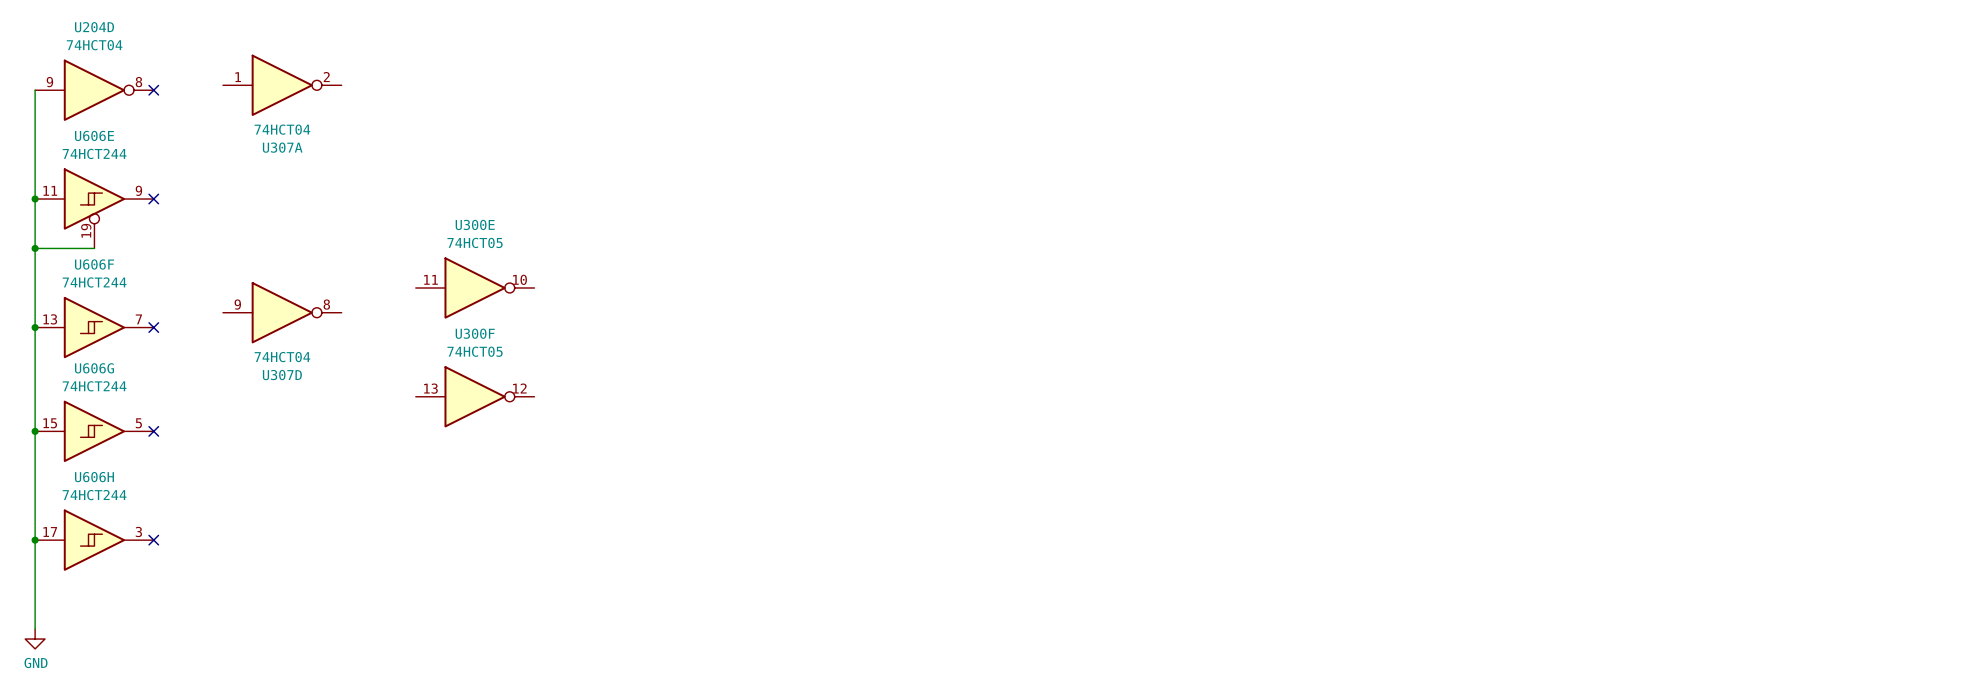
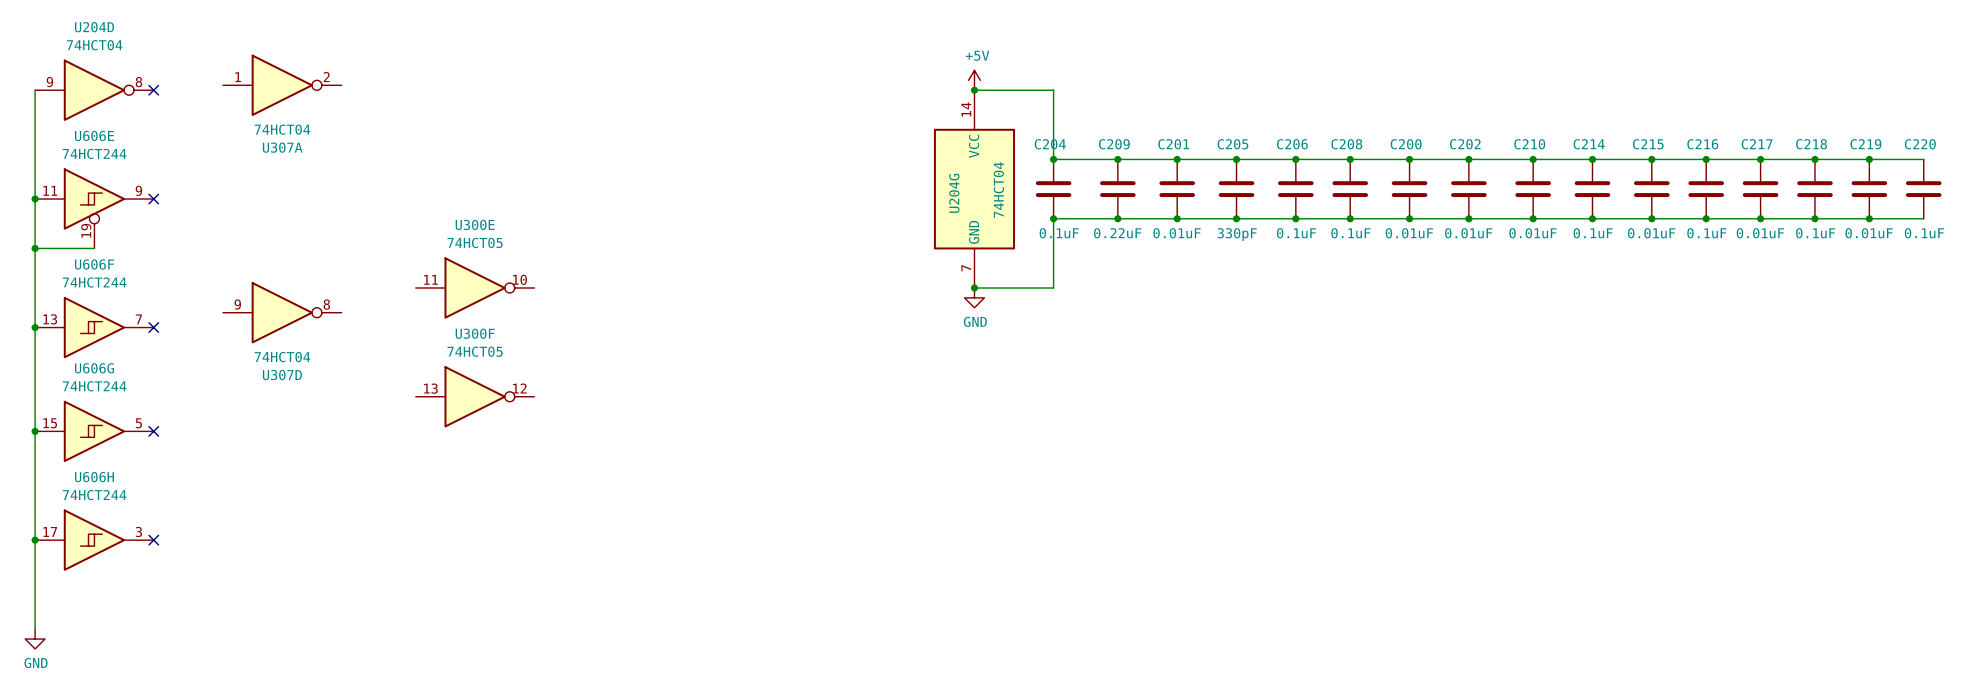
power symbol: none -> +5V (974, 80)
wire: none -> (974, 90) (1053, 90) (1053, 159) (1923, 159)
junction: none -> (974, 90)
junction: none -> (1053, 159)
junction: none -> (1117, 159)
junction: none -> (1177, 159)
junction: none -> (1236, 159)
junction: none -> (1295, 159)
junction: none -> (1350, 159)
junction: none -> (1409, 159)
junction: none -> (1468, 159)
junction: none -> (1533, 159)
junction: none -> (1592, 159)
junction: none -> (1651, 159)
junction: none -> (1706, 159)
junction: none -> (1760, 159)
junction: none -> (1814, 159)
junction: none -> (1869, 159)
U204G: none -> 74HCT04 (974, 189)
C204: none -> 0.1uF (1053, 189)
C209: none -> 0.22uF (1117, 189)
C201: none -> 0.01uF (1177, 189)
C205: none -> 330pF (1236, 189)
C206: none -> 0.1uF (1295, 189)
C208: none -> 0.1uF (1350, 189)
C200: none -> 0.01uF (1409, 189)
C202: none -> 0.01uF (1468, 189)
C210: none -> 0.01uF (1533, 189)
C214: none -> 0.1uF (1592, 189)
C215: none -> 0.01uF (1651, 189)
C216: none -> 0.1uF (1706, 189)
C217: none -> 0.01uF (1760, 189)
C218: none -> 0.1uF (1814, 189)
C219: none -> 0.01uF (1869, 189)
C220: none -> 0.1uF (1923, 189)
junction: none -> (1053, 218)
junction: none -> (1117, 218)
junction: none -> (1177, 218)
junction: none -> (1236, 218)
junction: none -> (1295, 218)
junction: none -> (1350, 218)
junction: none -> (1409, 218)
junction: none -> (1468, 218)
junction: none -> (1533, 218)
junction: none -> (1592, 218)
junction: none -> (1651, 218)
junction: none -> (1706, 218)
junction: none -> (1760, 218)
junction: none -> (1814, 218)
junction: none -> (1869, 218)
wire: none -> (1923, 218) (1053, 218) (1053, 288) (974, 288)
junction: none -> (974, 288)
power symbol: none -> GND (974, 297)

